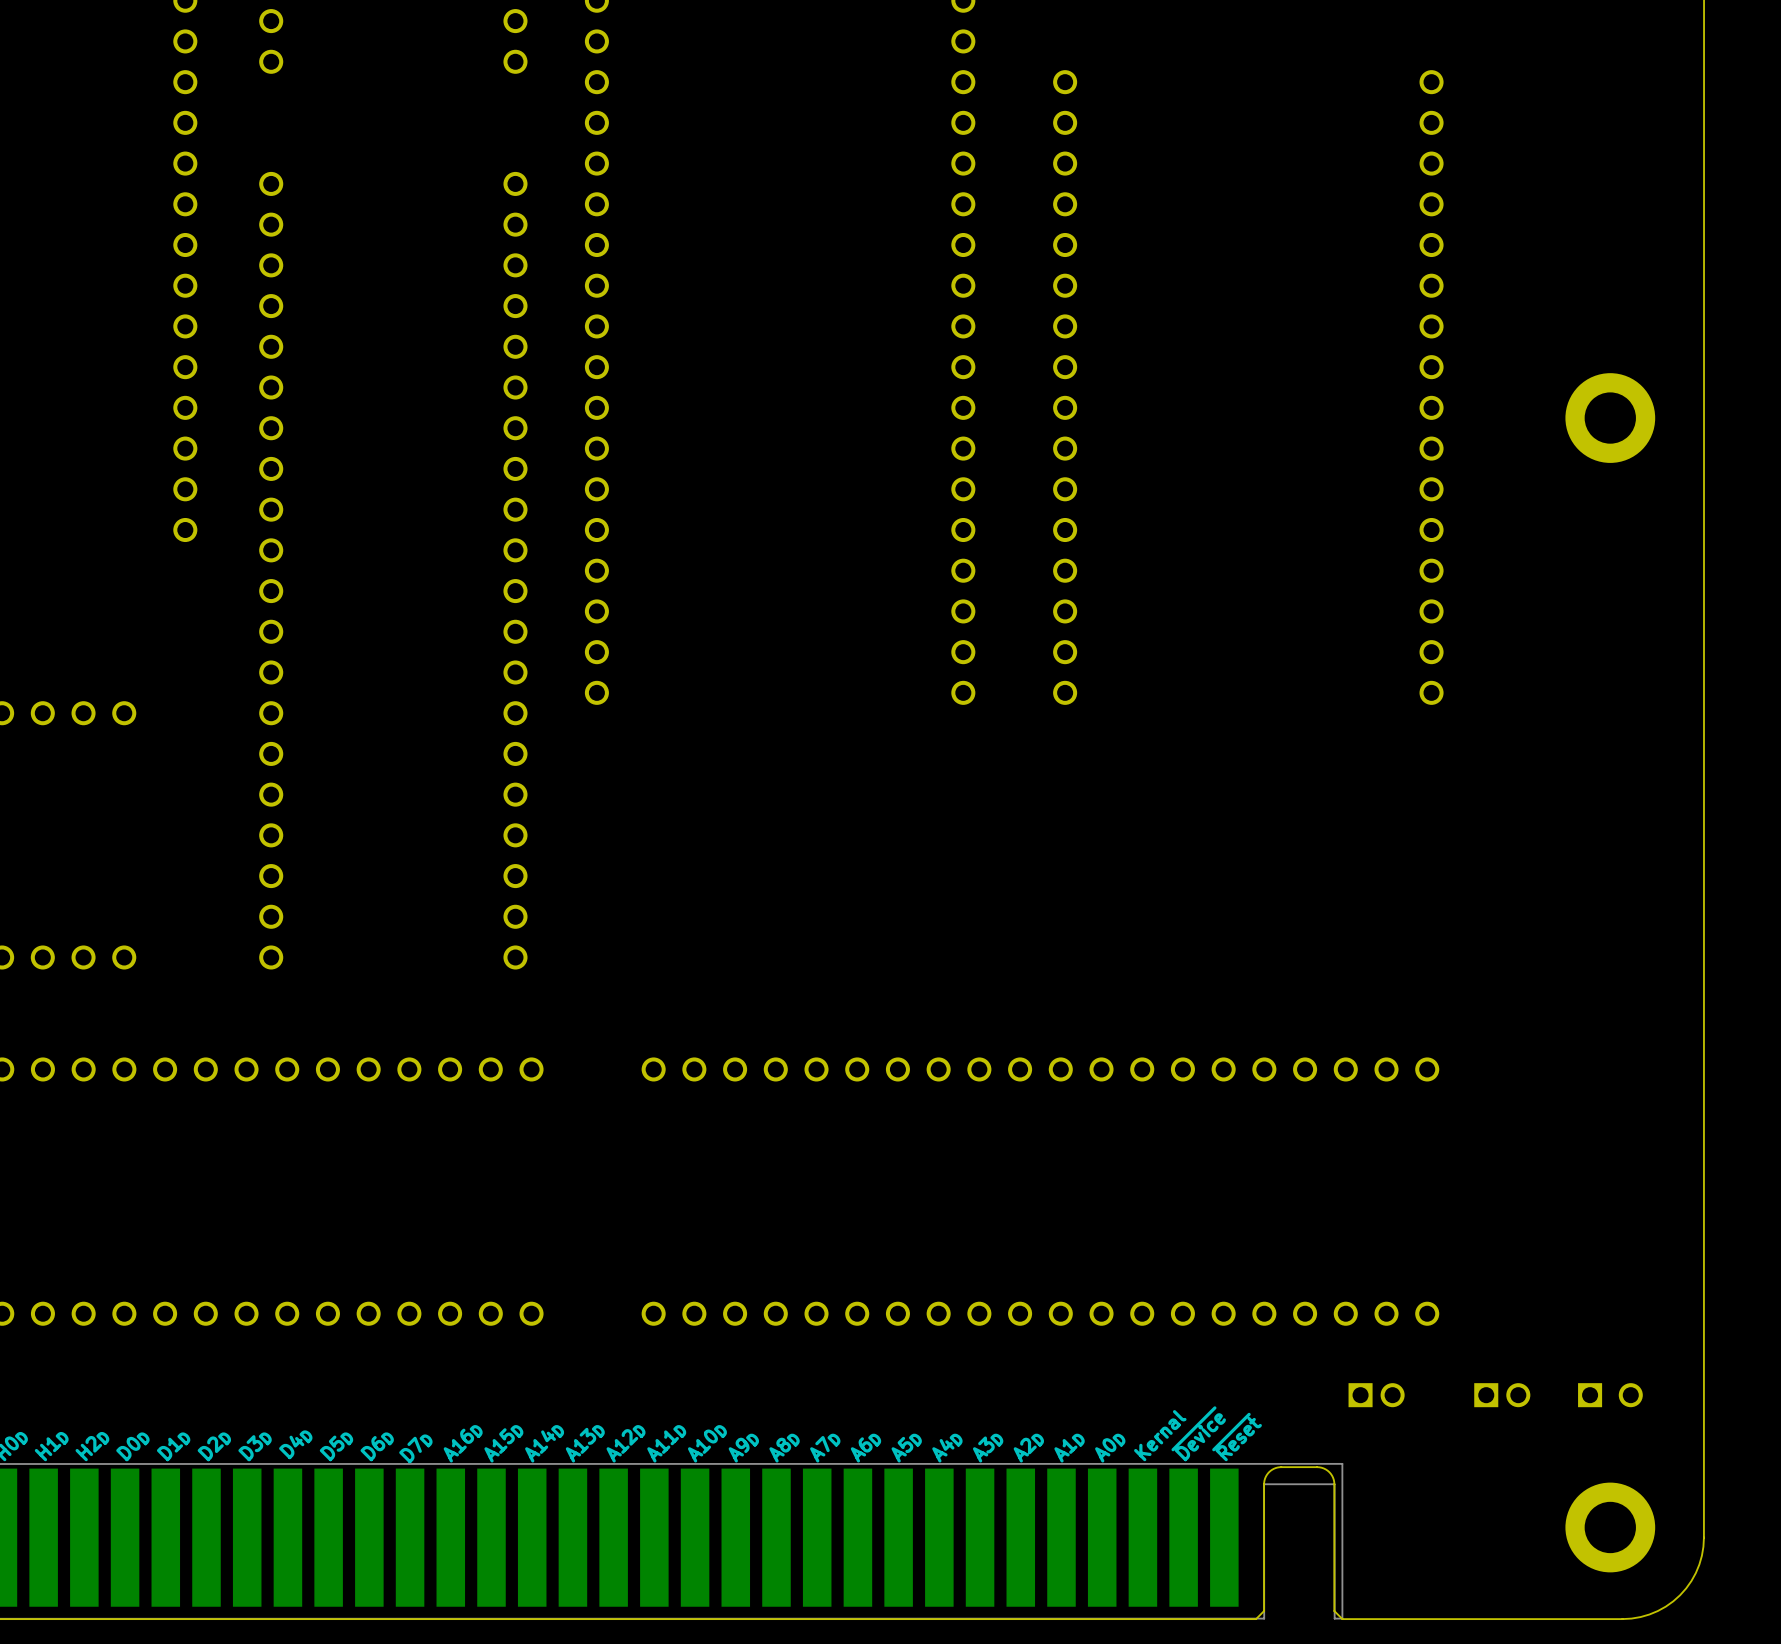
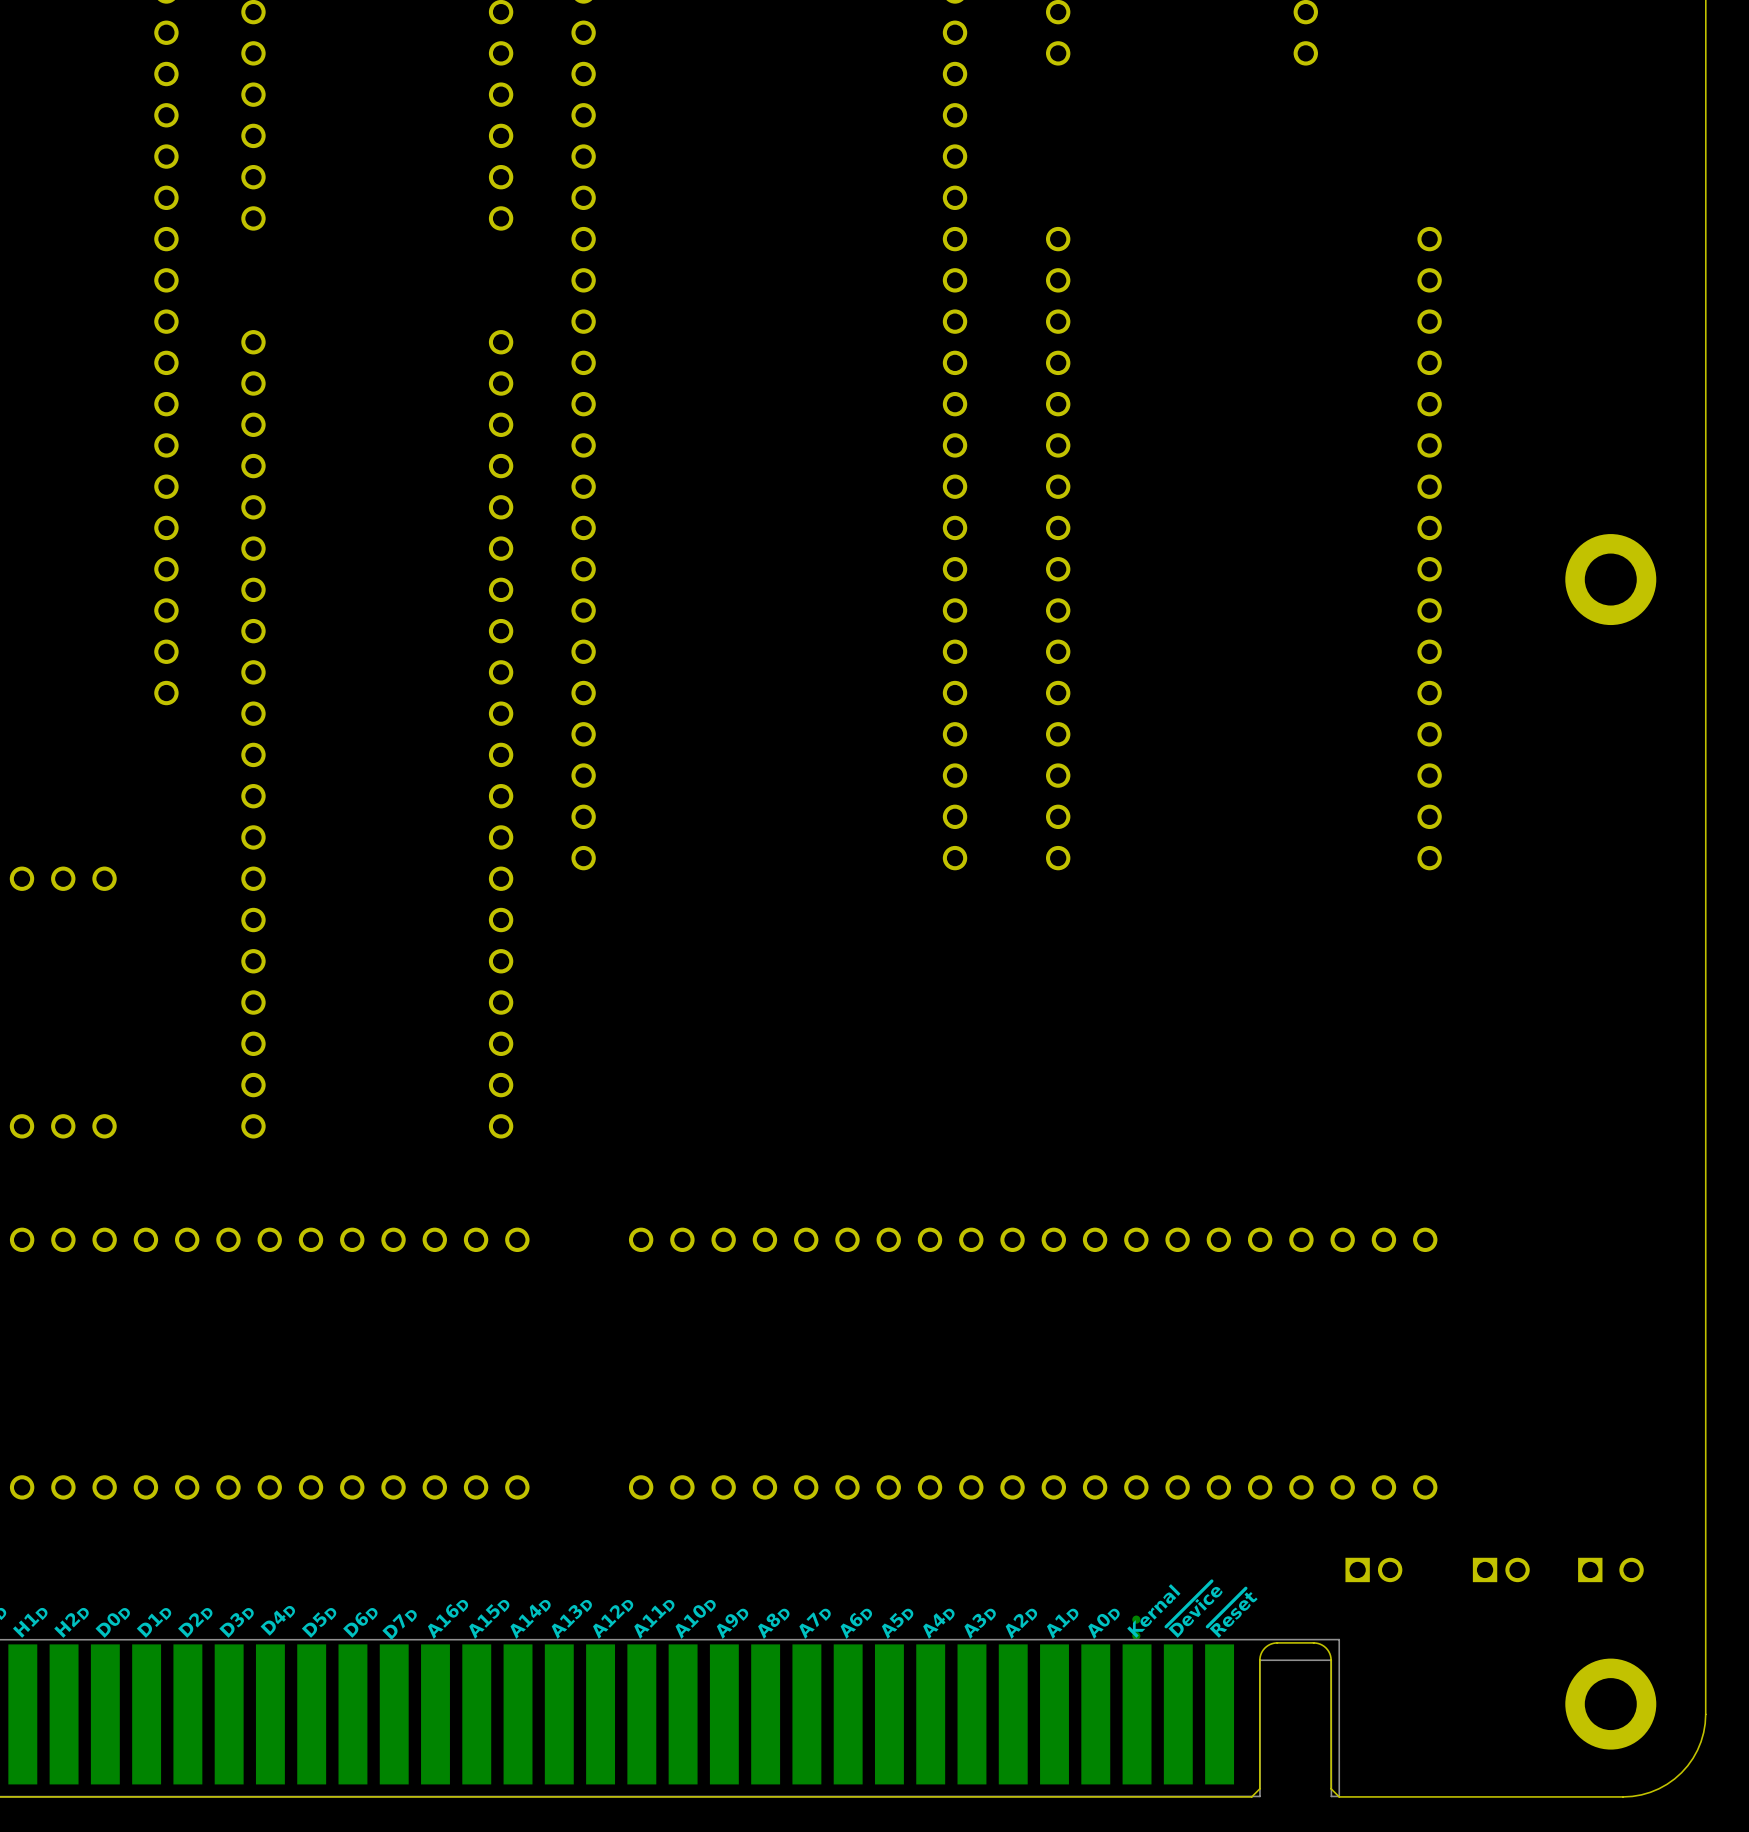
part: none -> (1136, 1627)

